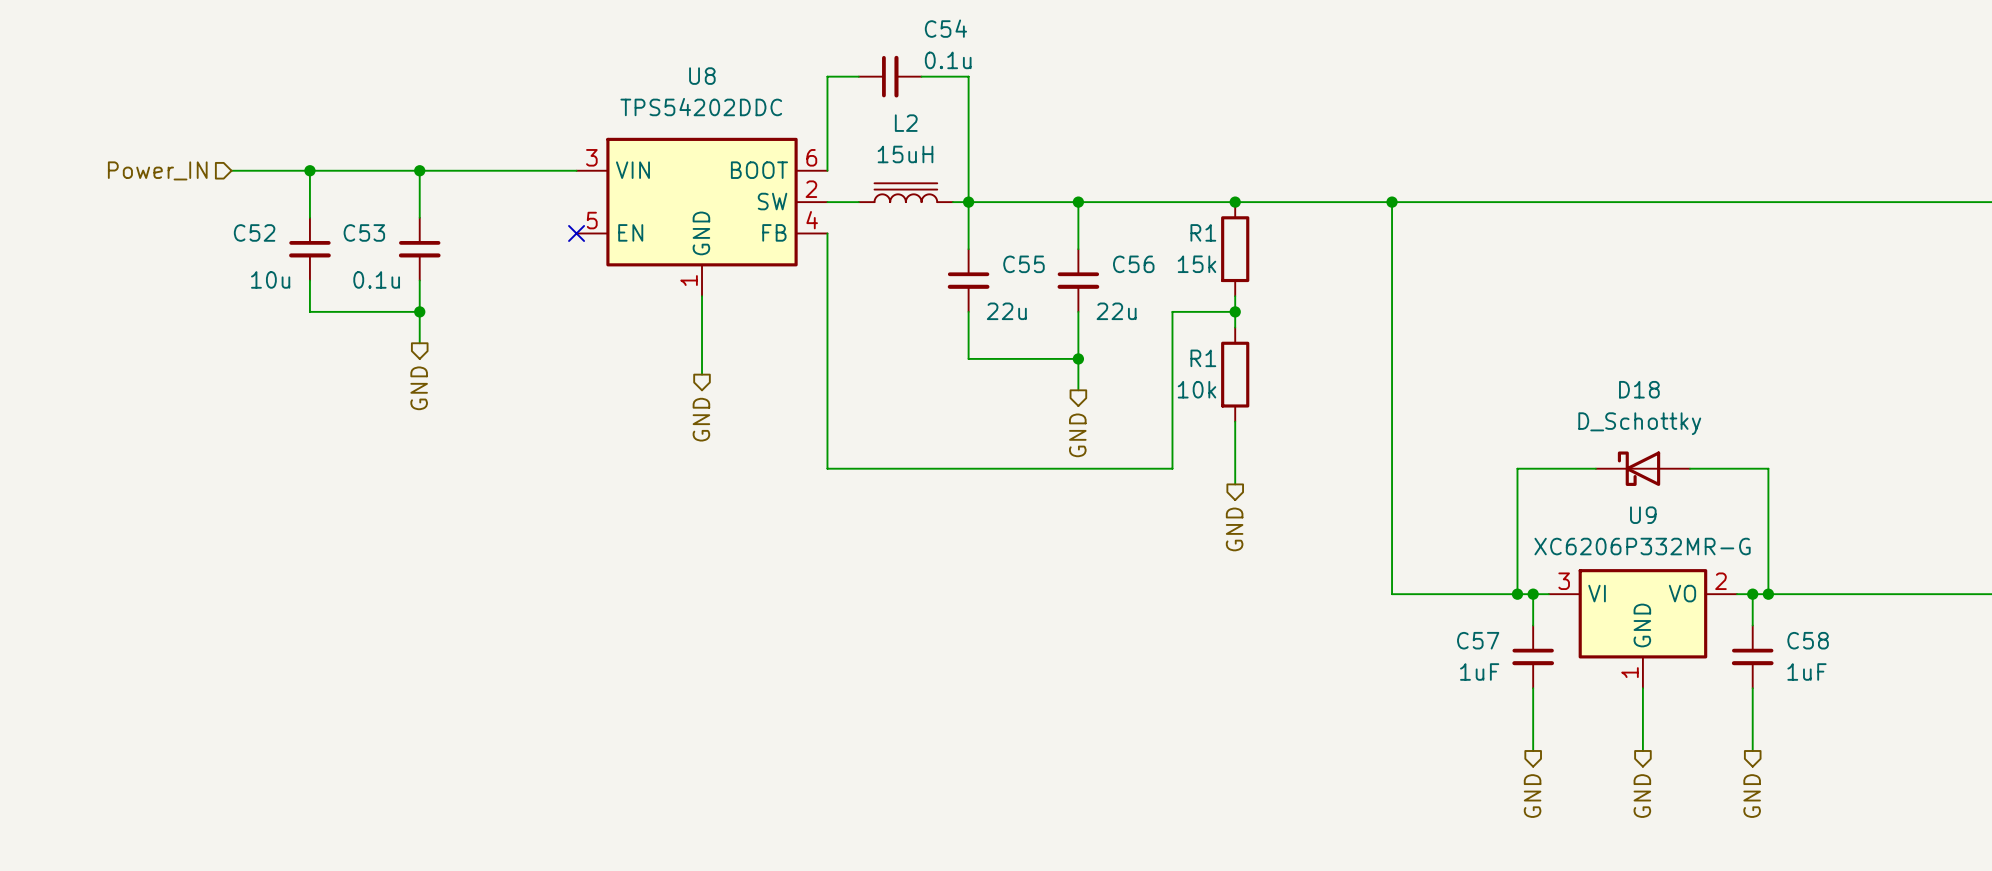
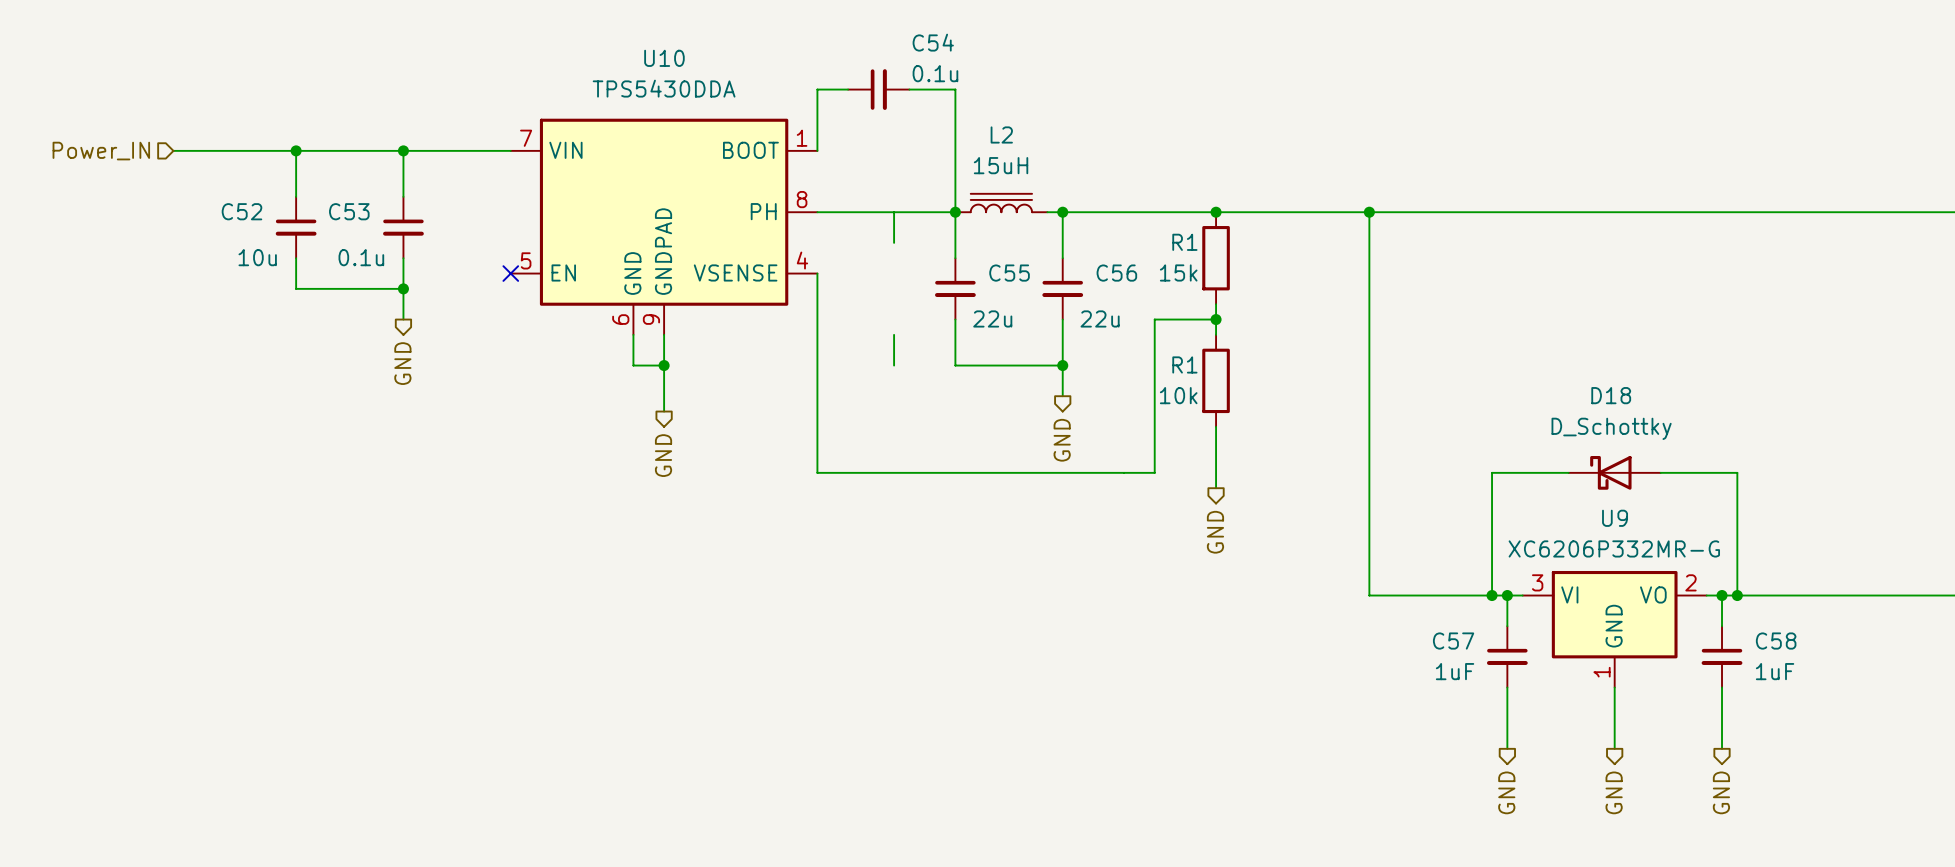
wire: (827, 139) (827, 170) -> (894, 334) (894, 365)
hierarchical label position: Power_IN (157, 170) -> Power_IN (101, 151)
wire: (231, 170) (576, 170) -> (173, 150) (510, 150)
wire: (309, 170) (309, 217) -> (296, 150) (296, 196)
junction position: (309, 170) -> (296, 150)
wire: (419, 170) (419, 217) -> (403, 150) (403, 196)
junction position: (419, 170) -> (403, 150)
L2 position: (905, 192) -> (1001, 203)
wire: (968, 202) (1062, 202) -> (848, 212) (940, 212)
U10: none -> TPS5430DDA (664, 226)
U8: TPS54202DDC (702, 217) -> none
no-connect mark position: (576, 233) -> (510, 273)
wire: (827, 233) (827, 264) -> (894, 212) (894, 242)
C52 position: (309, 249) -> (296, 227)
C53 position: (419, 249) -> (403, 227)
wire: (309, 280) (309, 311) (419, 311) -> (296, 258) (296, 288) (403, 288)
wire: (419, 280) (419, 343) -> (403, 258) (403, 319)
wire: (702, 296) (702, 374) -> (664, 334) (664, 411)
junction position: (419, 311) -> (403, 288)
wire: none -> (633, 334) (633, 365) (664, 365)
junction: none -> (664, 365)
hierarchical label position: GND (419, 388) -> GND (402, 363)
hierarchical label position: GND (701, 419) -> GND (663, 455)

